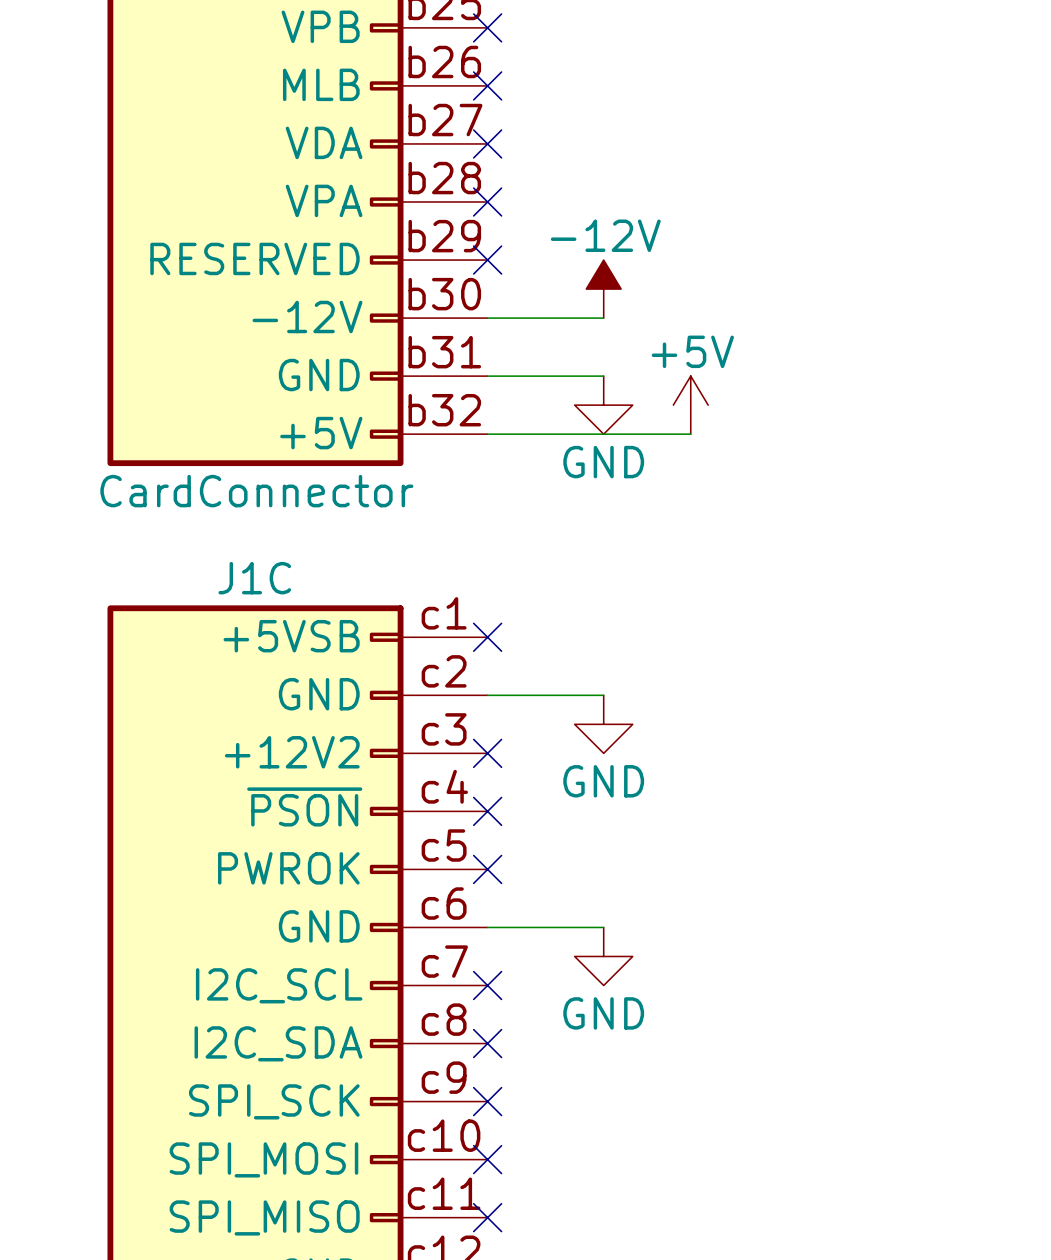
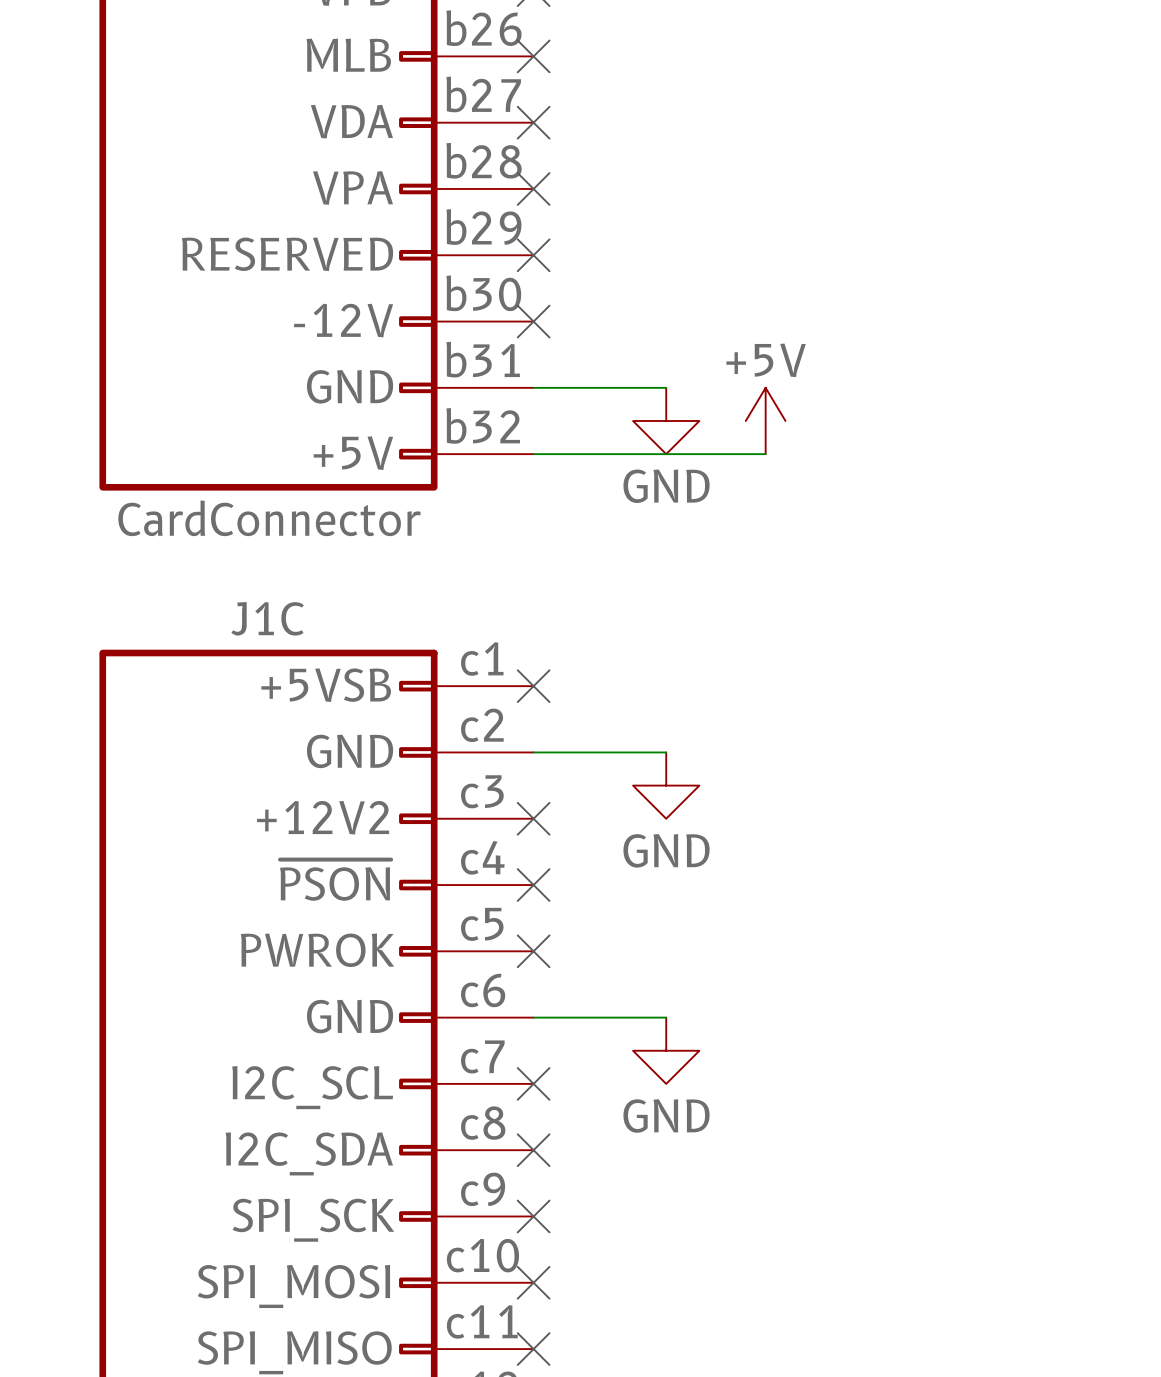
power symbol: -12V (603, 289) -> none
wire: (487, 318) (603, 318) -> none
no-connect mark: none -> (533, 321)

